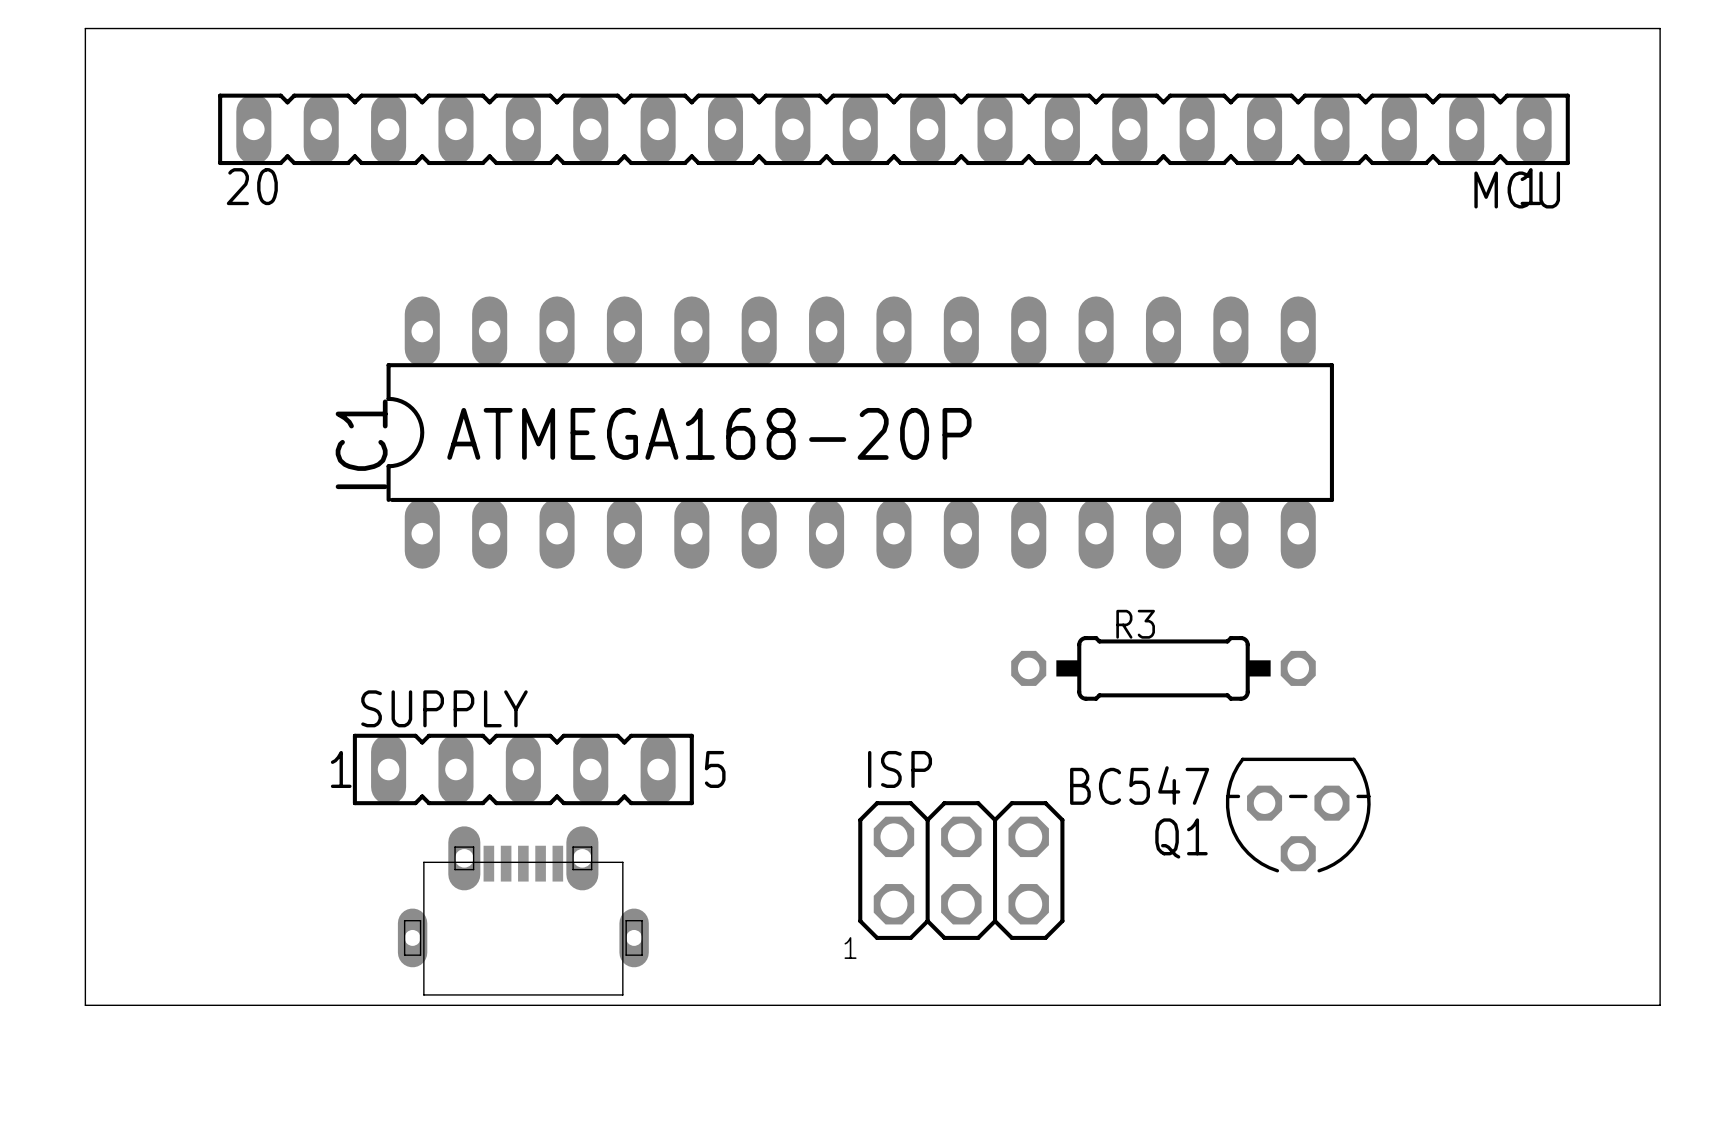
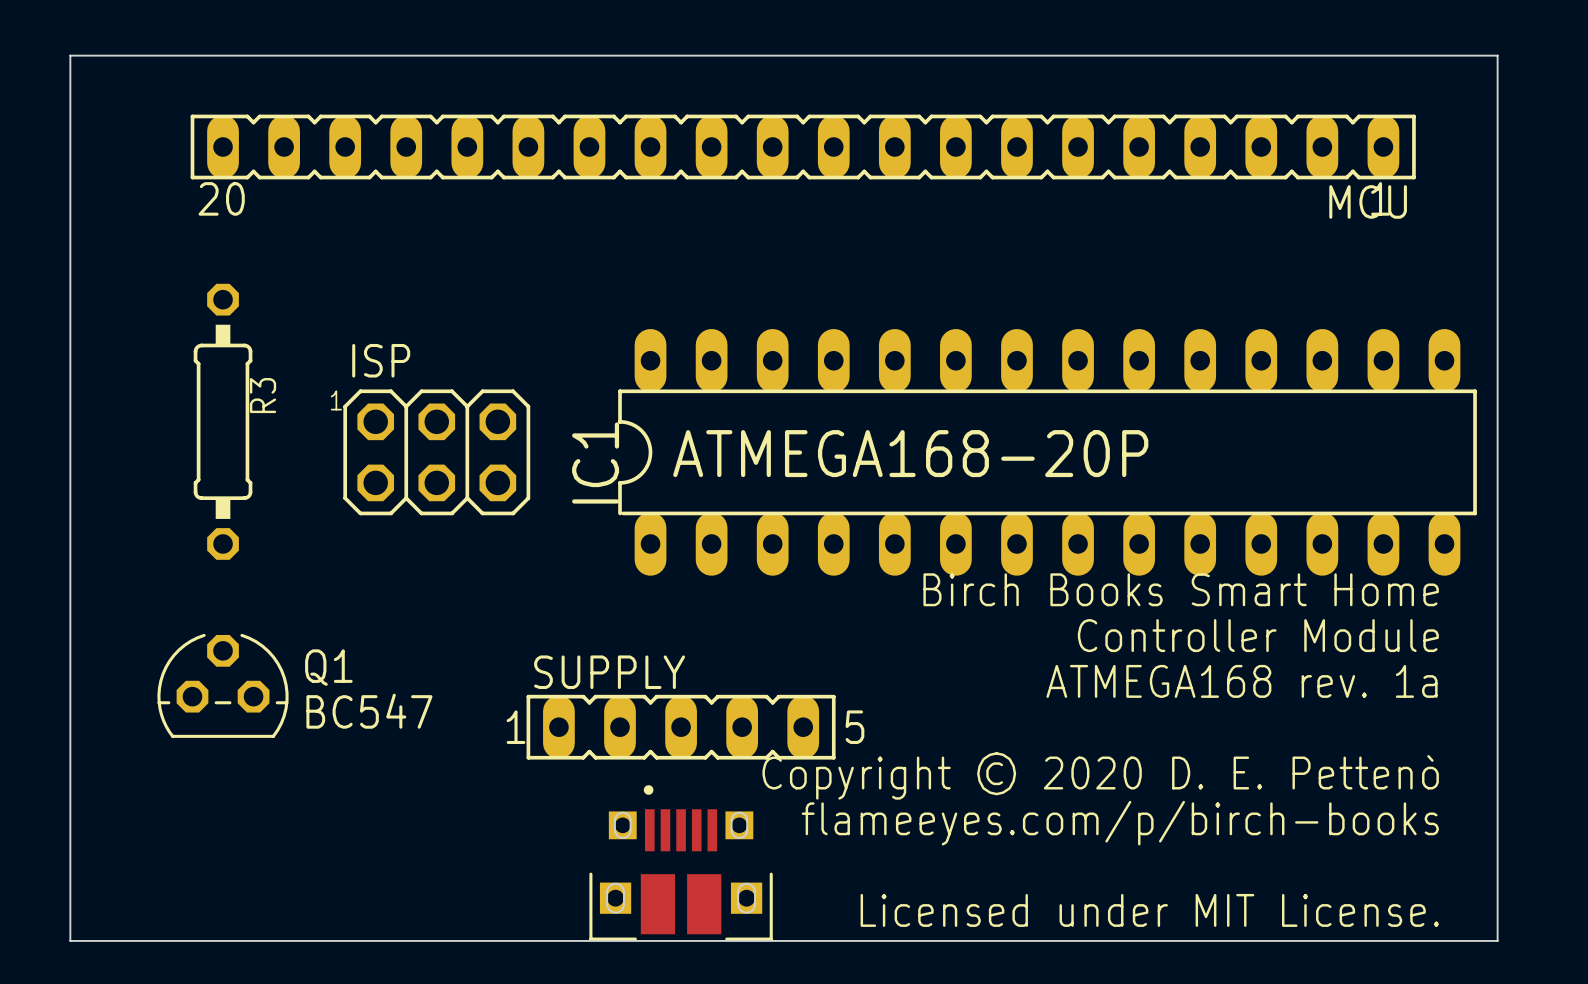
text: none -> 1 (336, 400)
IC1 position: (860, 432) -> (1047, 452)
text: none -> Birch Books Smart Home (1181, 589)
R3 rotation: 0° (1163, 668) -> 90° clockwise (223, 421)
R3 position: (1163, 668) -> (223, 421)
text: none -> Controller Module (1258, 635)
text: none -> ATMEGA168 rev. 1a (1241, 681)
SUPPLY position: (523, 769) -> (681, 727)
Q1 rotation: 0° (1298, 815) -> 180° (222, 685)
Q1 position: (1298, 815) -> (222, 685)
text: none -> Copyright © 2020 D. E. Pettenò (1100, 775)
ISP position: (961, 870) -> (436, 452)
text: none -> flameeyes.com/p/birch-books (1120, 823)
part: (523, 910) -> none
part: none -> (681, 862)
text: 1 (850, 948) -> none
text: none -> Licensed under MIT License. (1149, 910)

